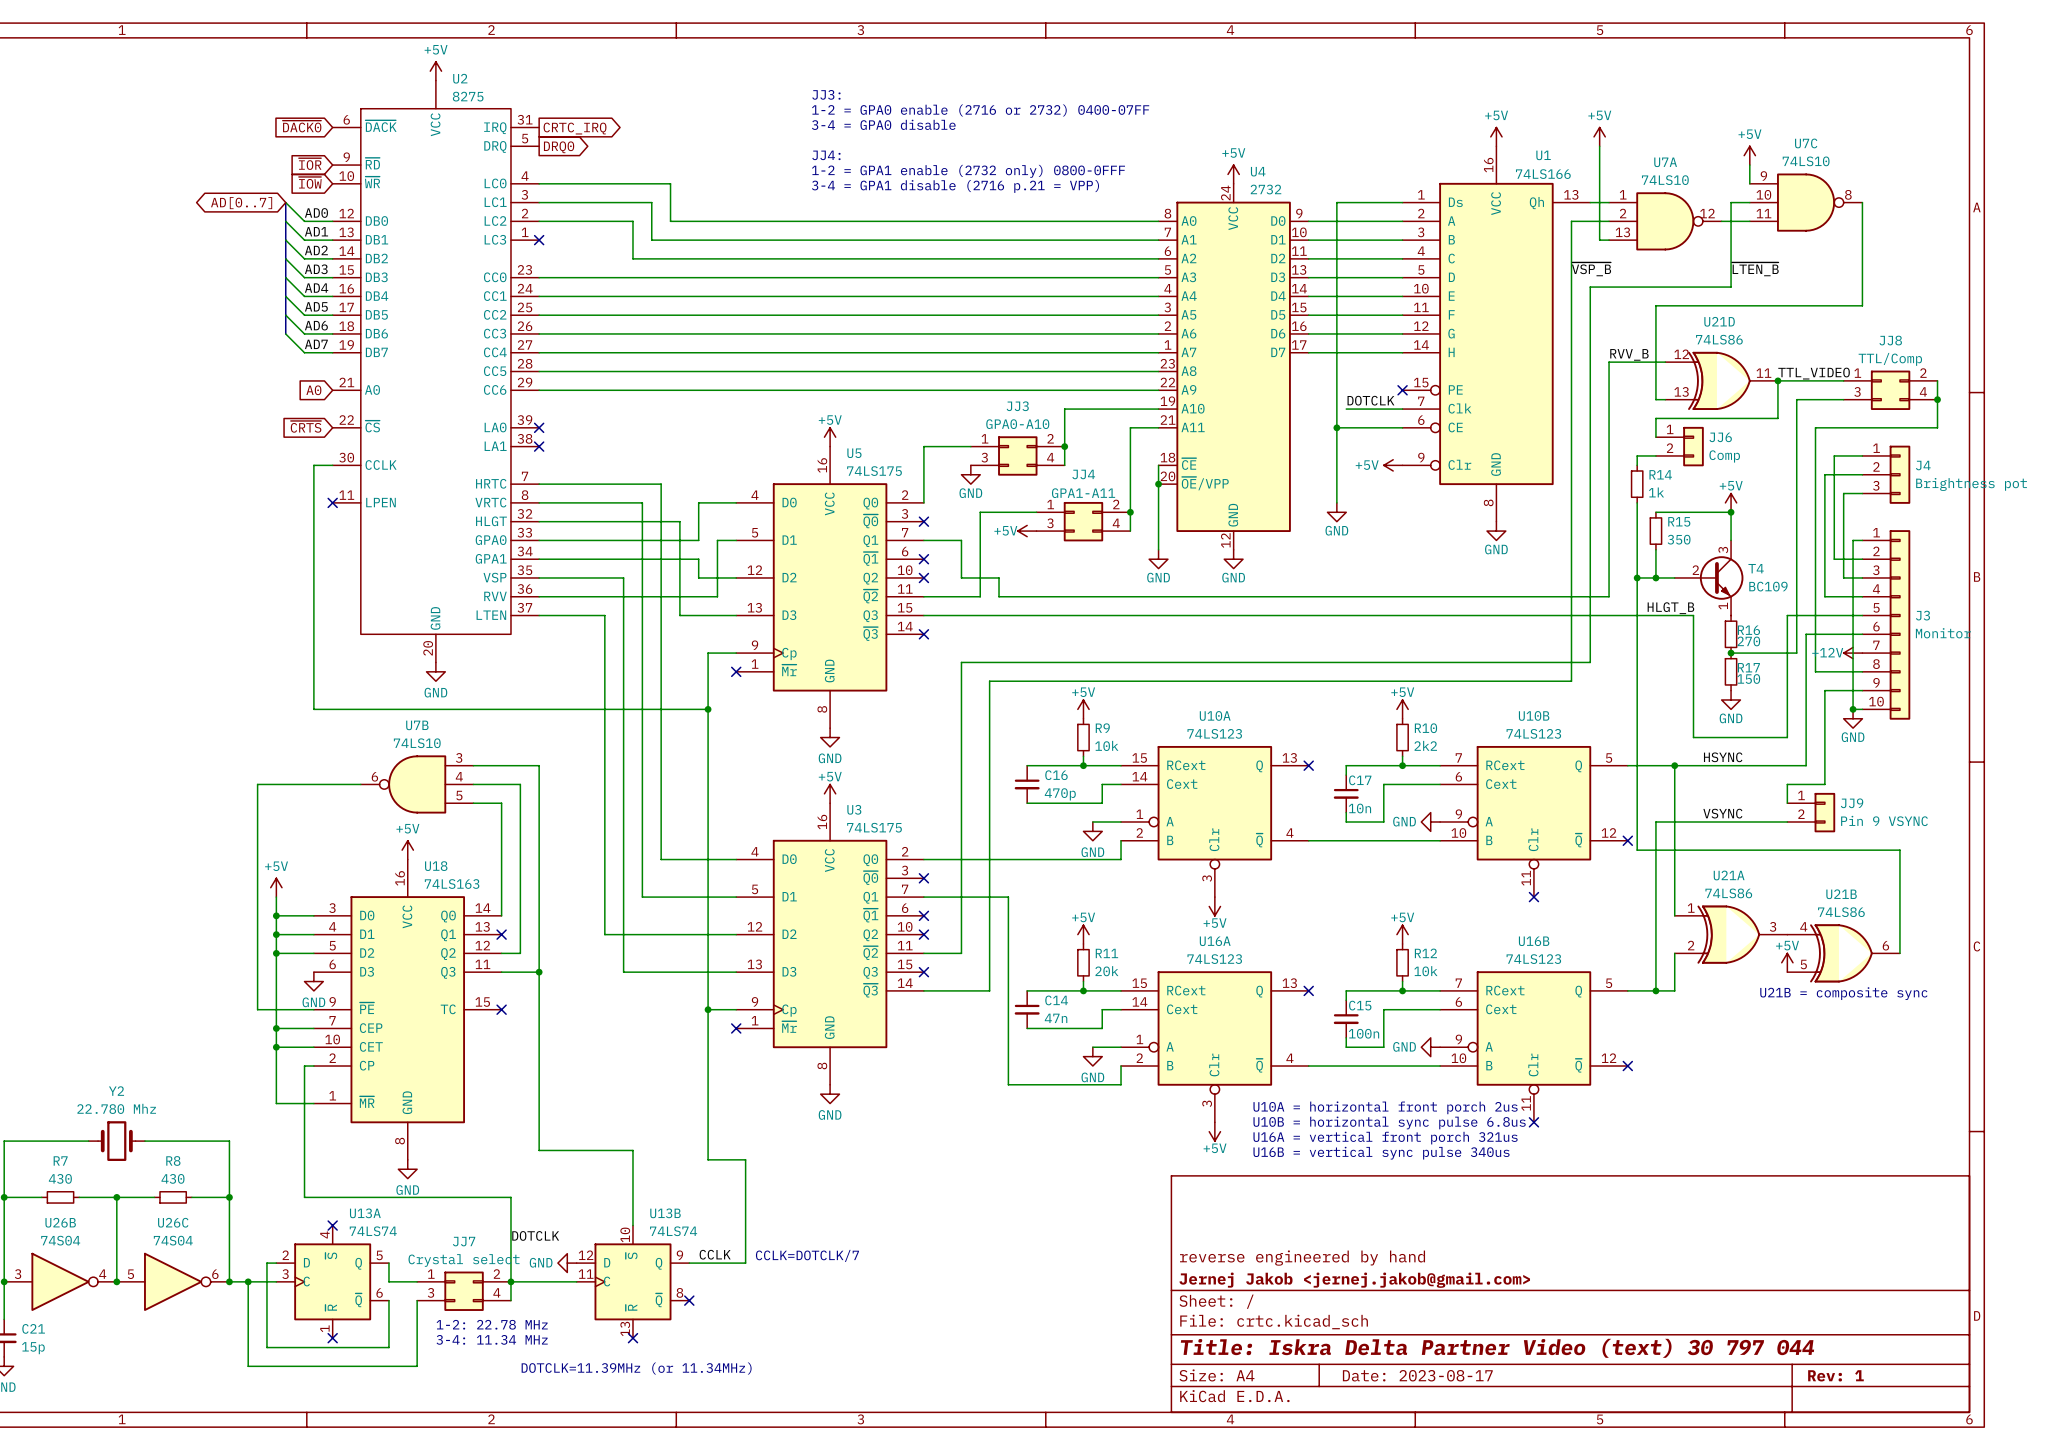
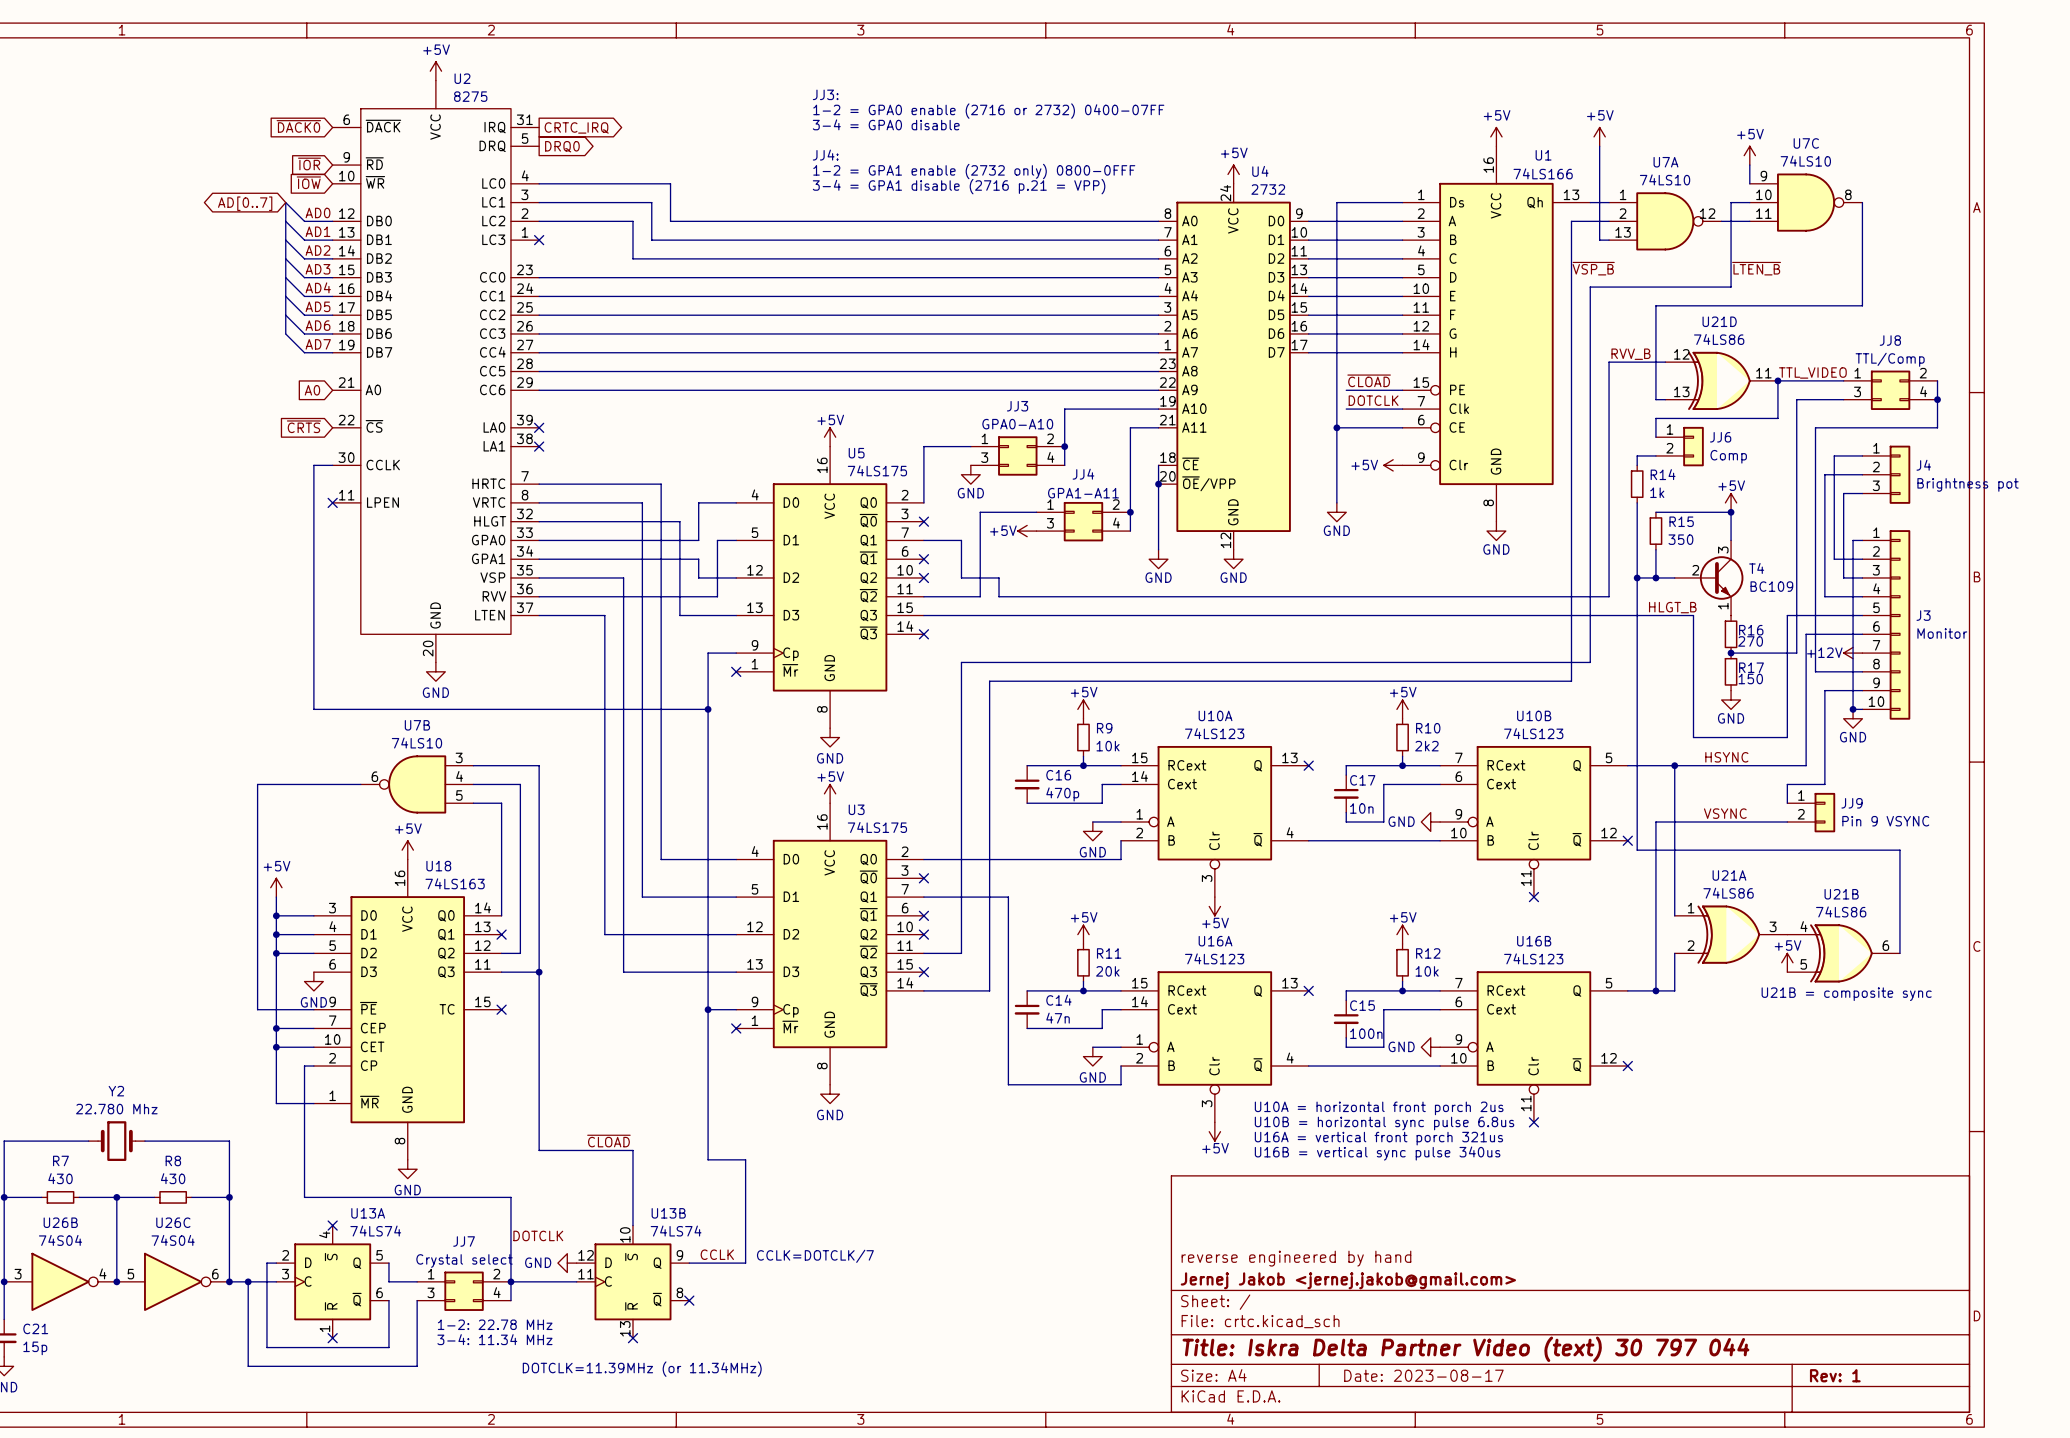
label: none -> ~{CLOAD} (1369, 380)
wire: none -> (1346, 390) (1402, 390)
no-connect mark: (1402, 390) -> none
label: none -> ~{CLOAD} (608, 1141)

